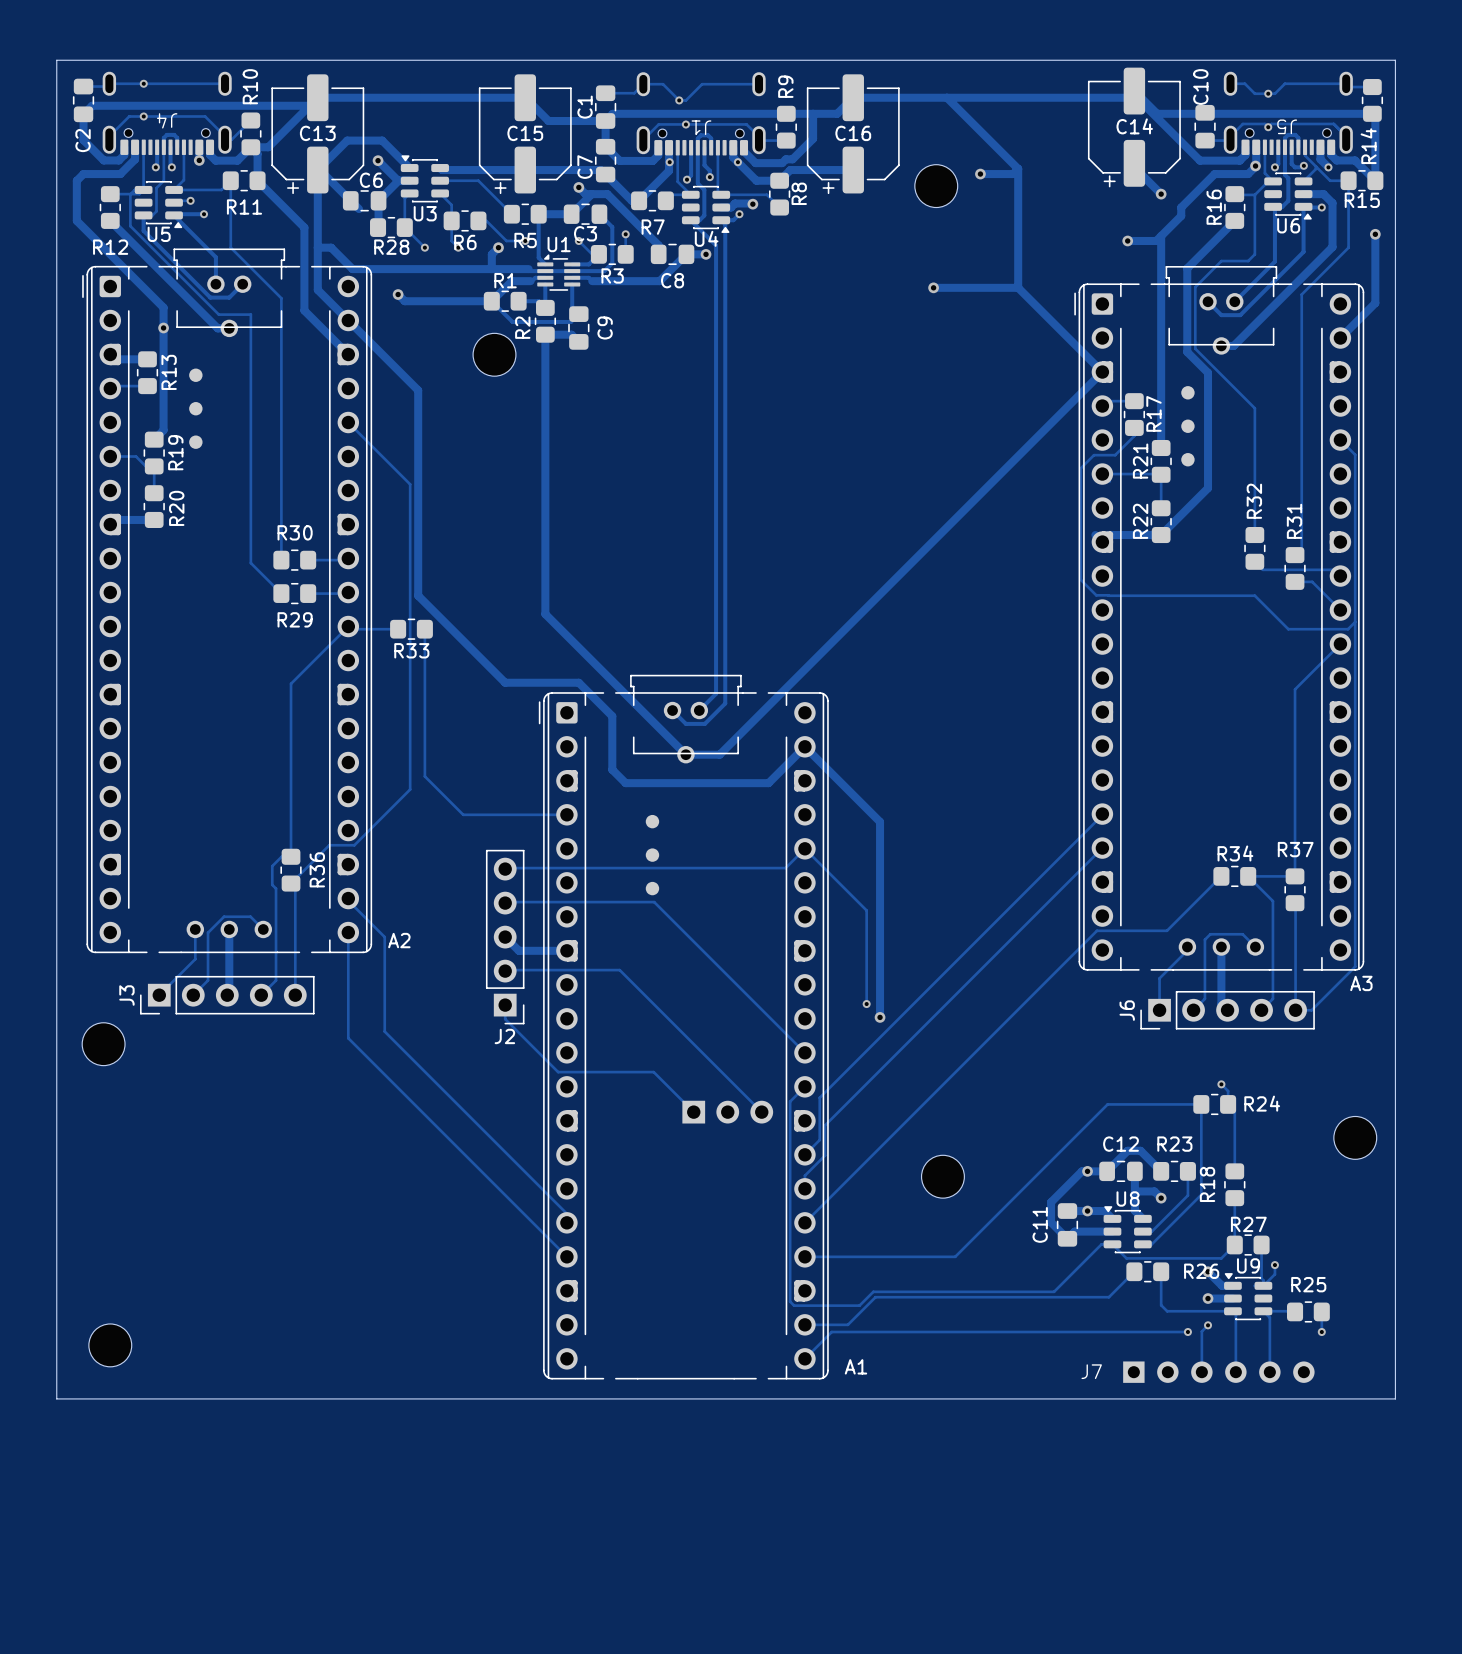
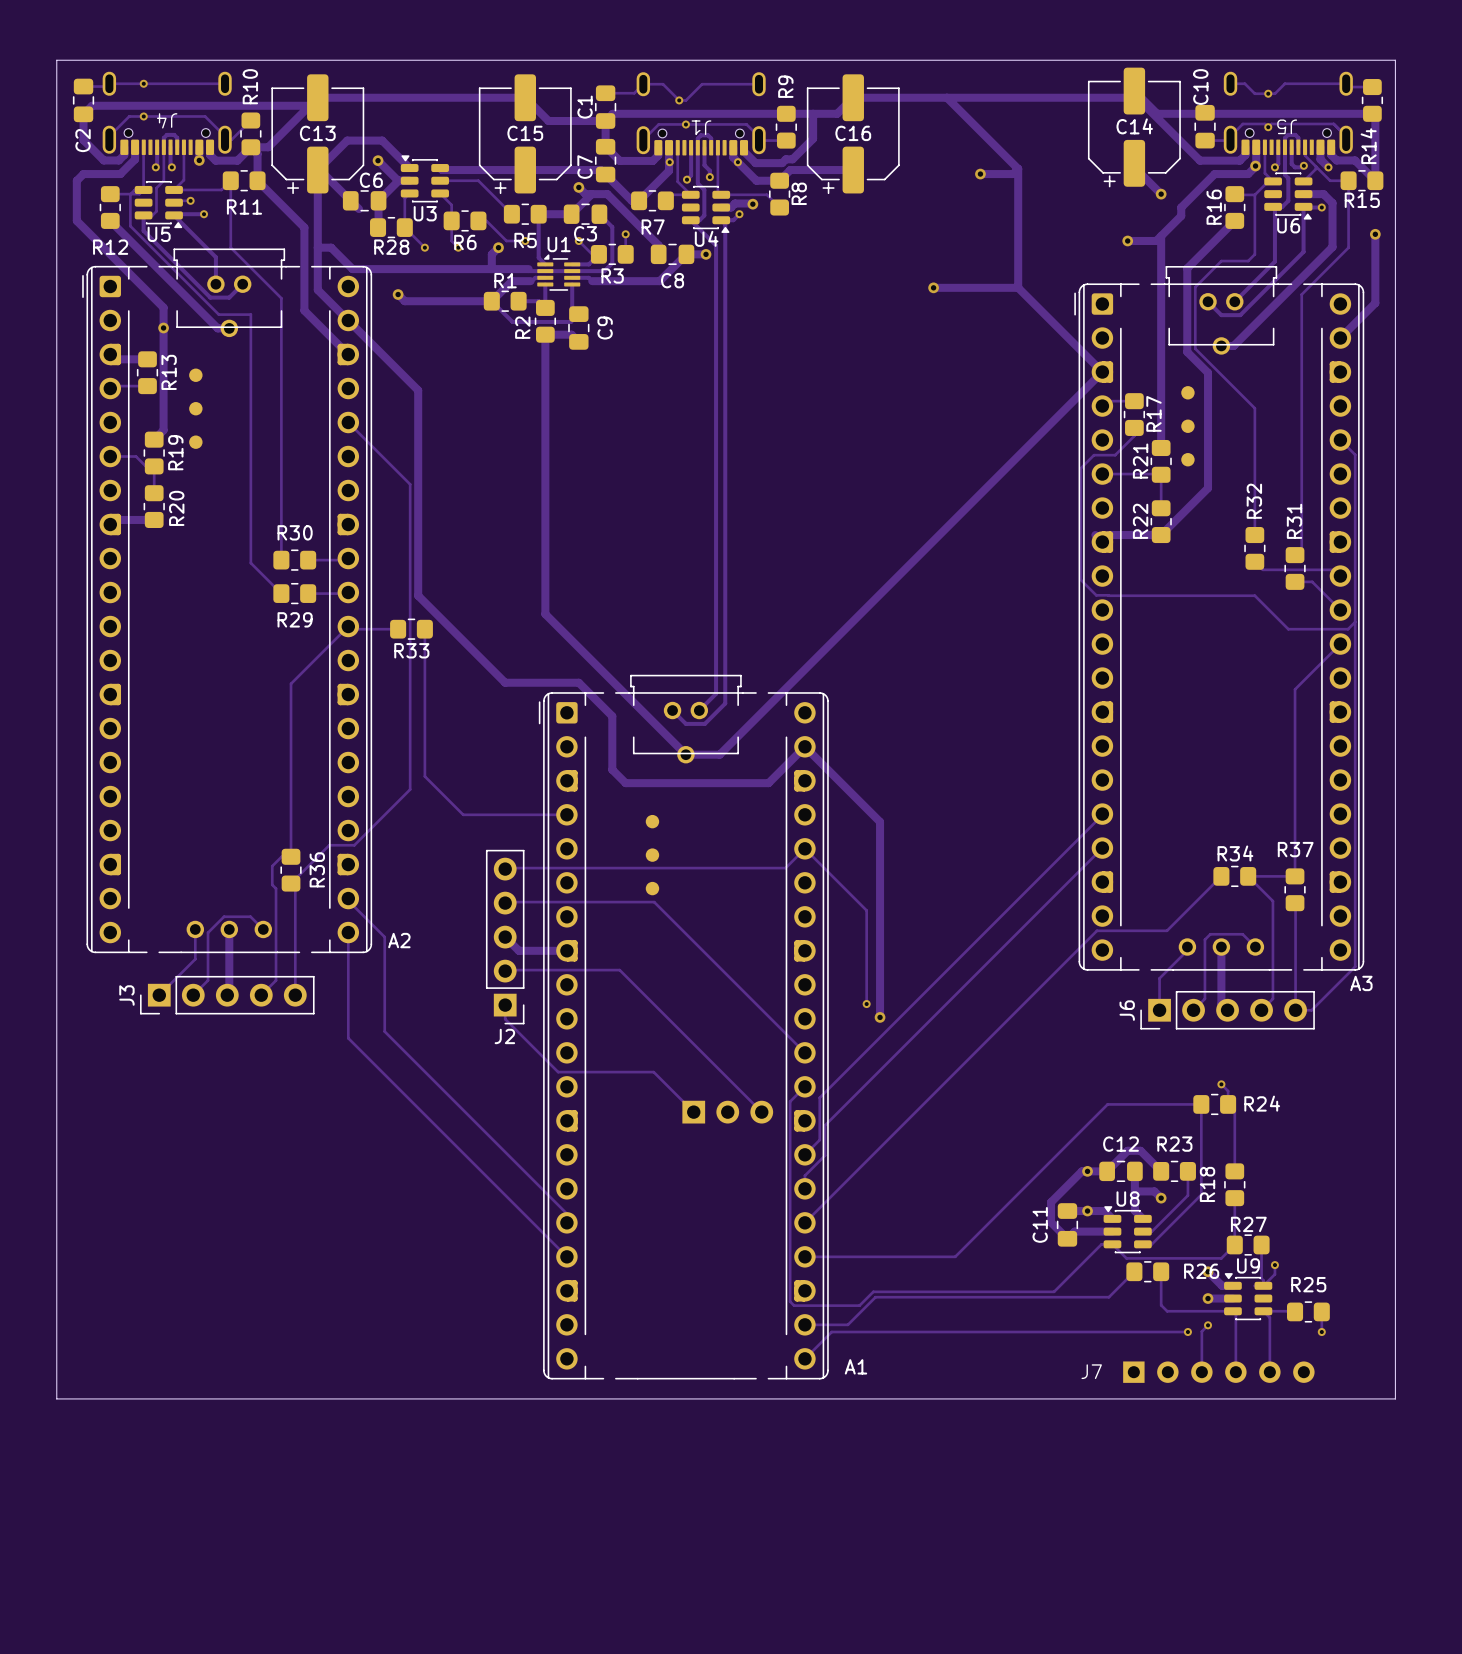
part: (936, 186) -> none
part: (494, 354) -> none
part: (103, 1044) -> none
part: (1355, 1137) -> none
part: (942, 1176) -> none
part: (110, 1345) -> none

